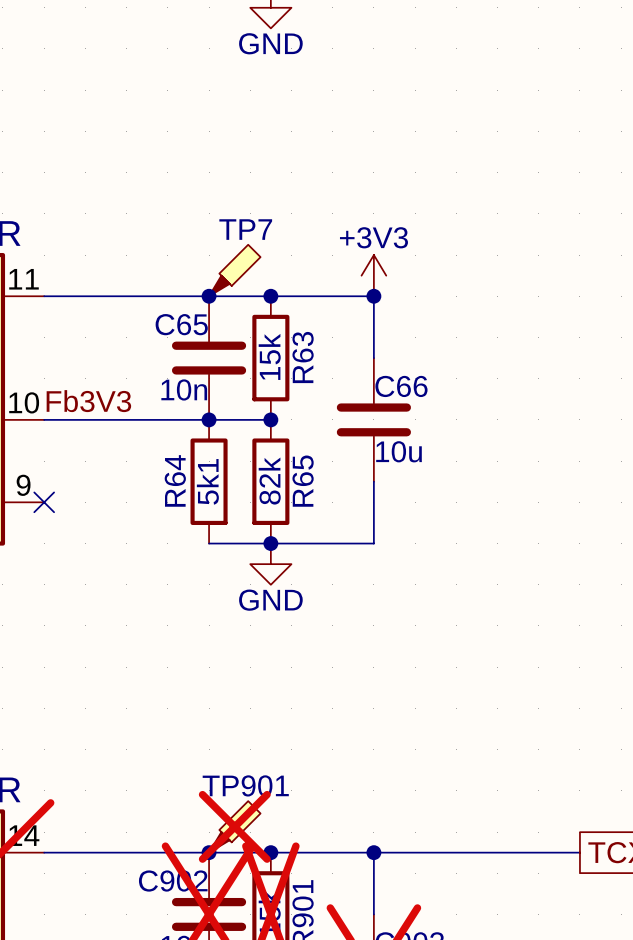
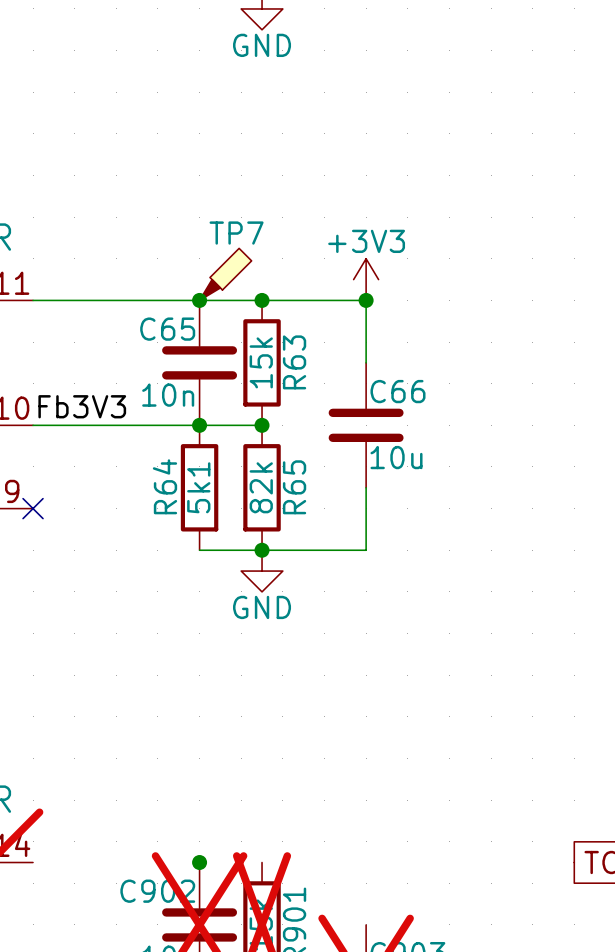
TP901: (234, 826) -> none
wire: (44, 852) (579, 852) -> none
junction: (270, 852) -> none
wire: (373, 852) (373, 914) -> none
junction: (373, 852) -> none

